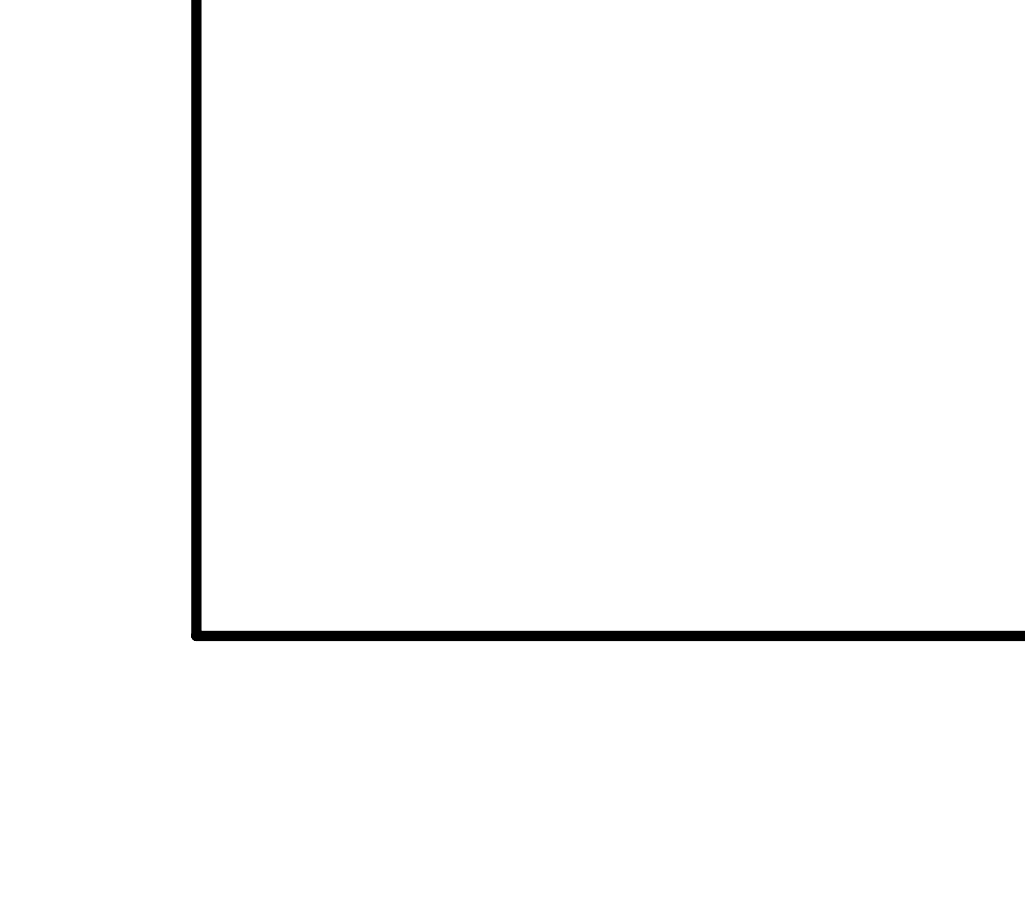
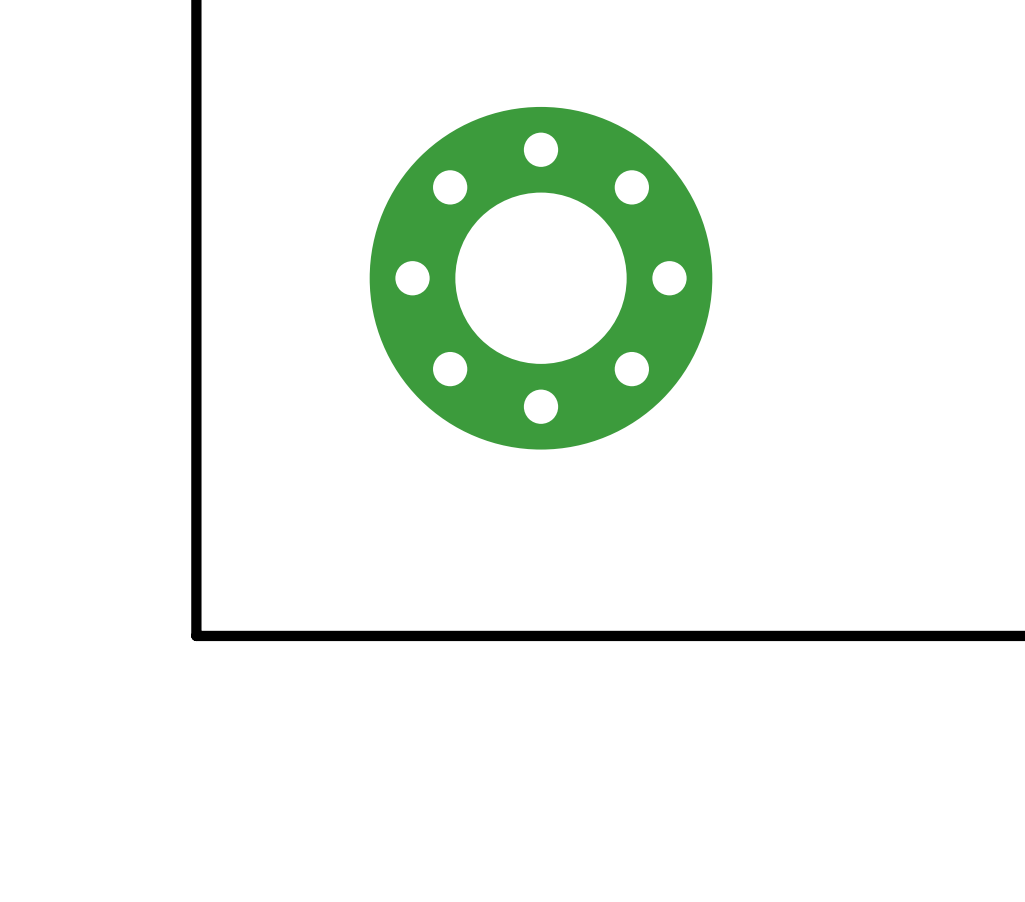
part: none -> (541, 278)

